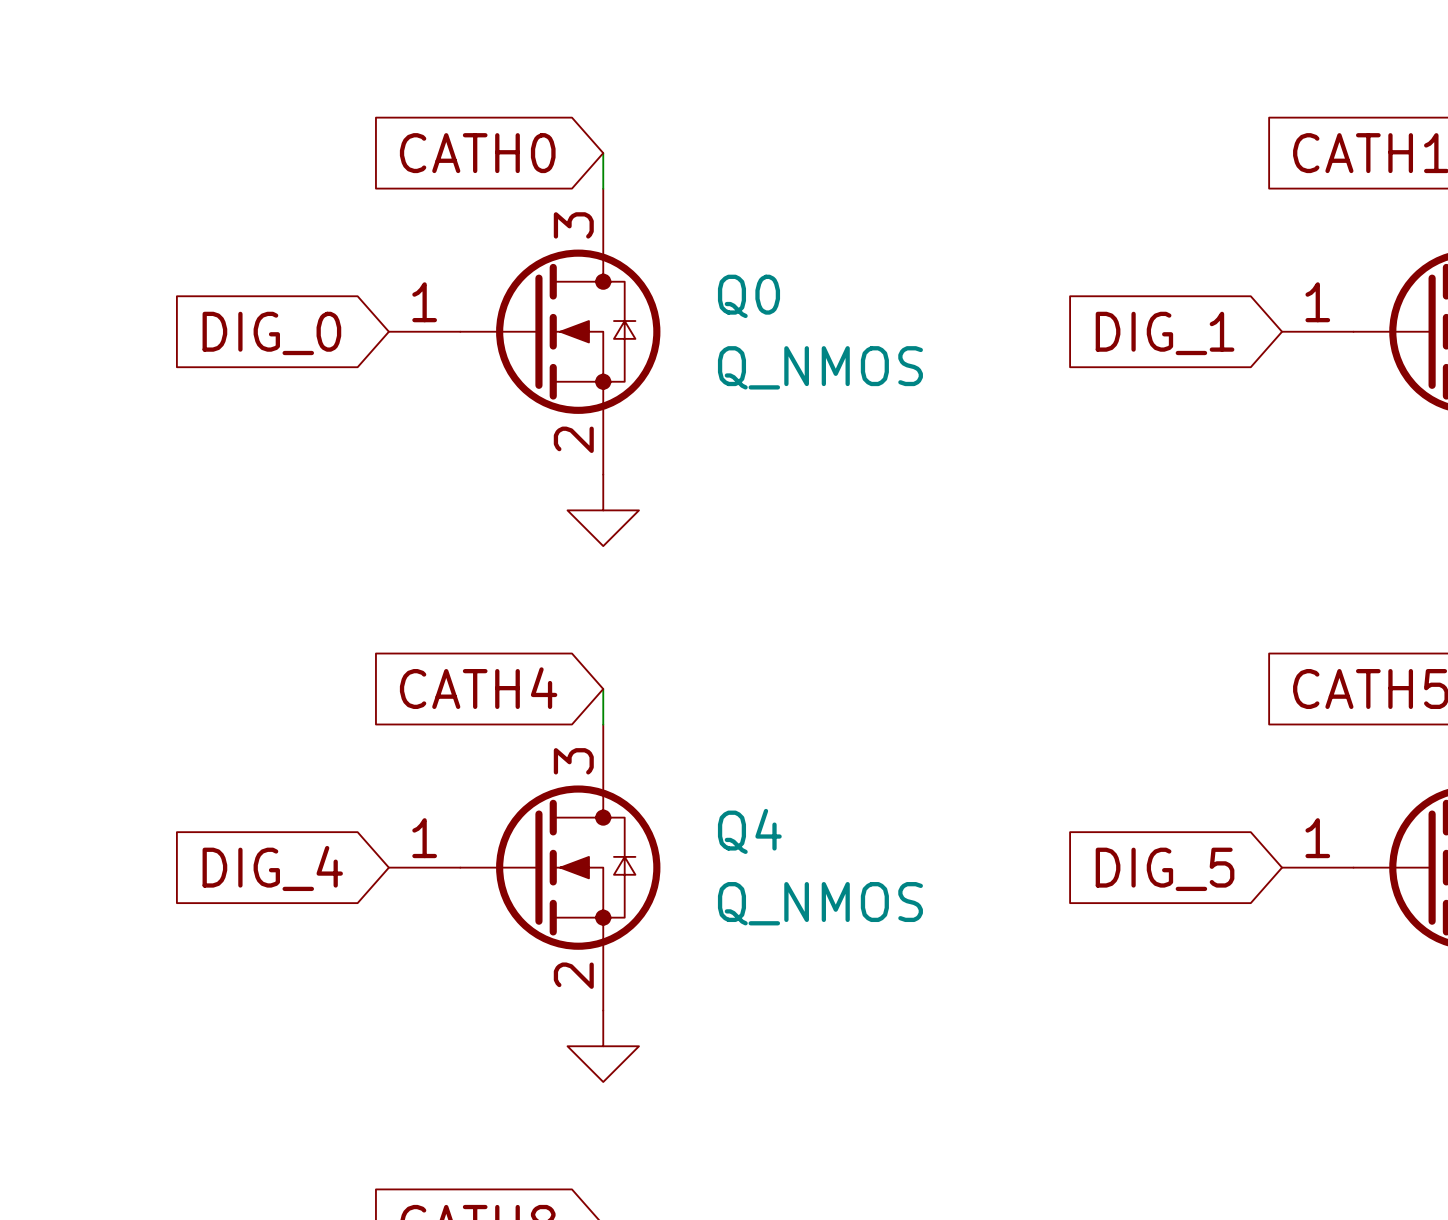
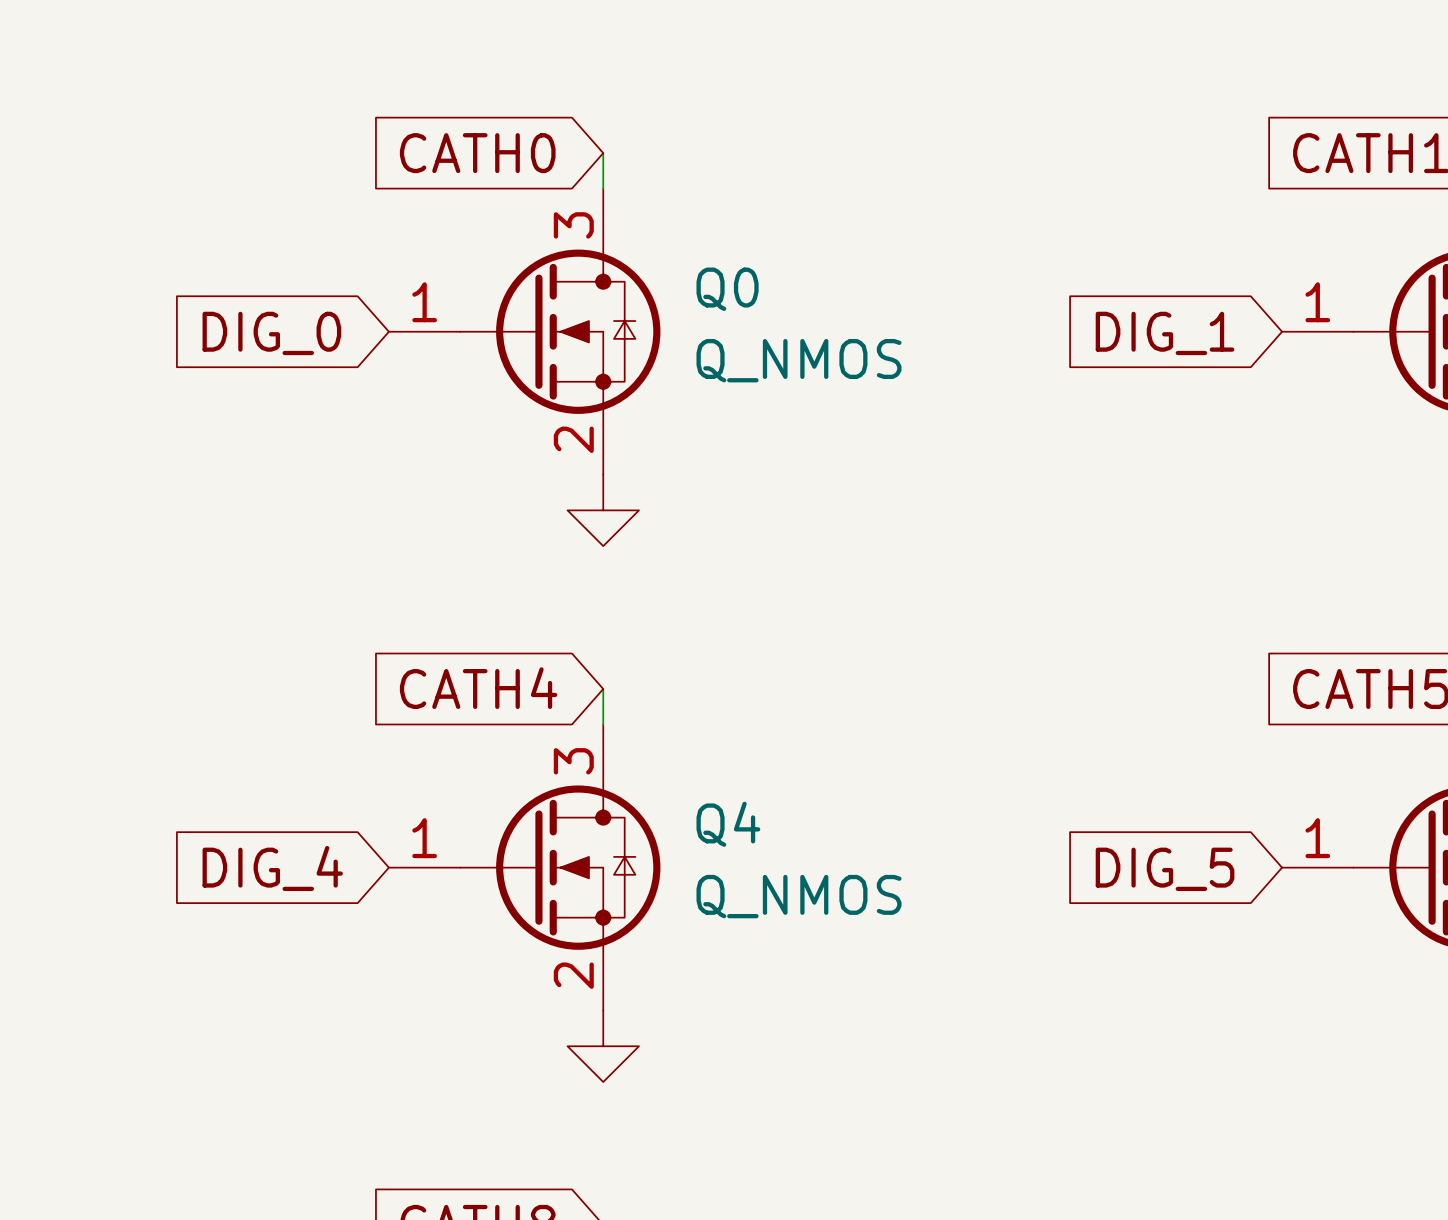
Q0 name position: Q0 (748, 296) -> Q0 (727, 289)
Q0 value position: Q_NMOS (820, 367) -> Q_NMOS (799, 360)
Q4 name position: Q4 (749, 831) -> Q4 (728, 824)
Q4 value position: Q_NMOS (820, 903) -> Q_NMOS (799, 896)

